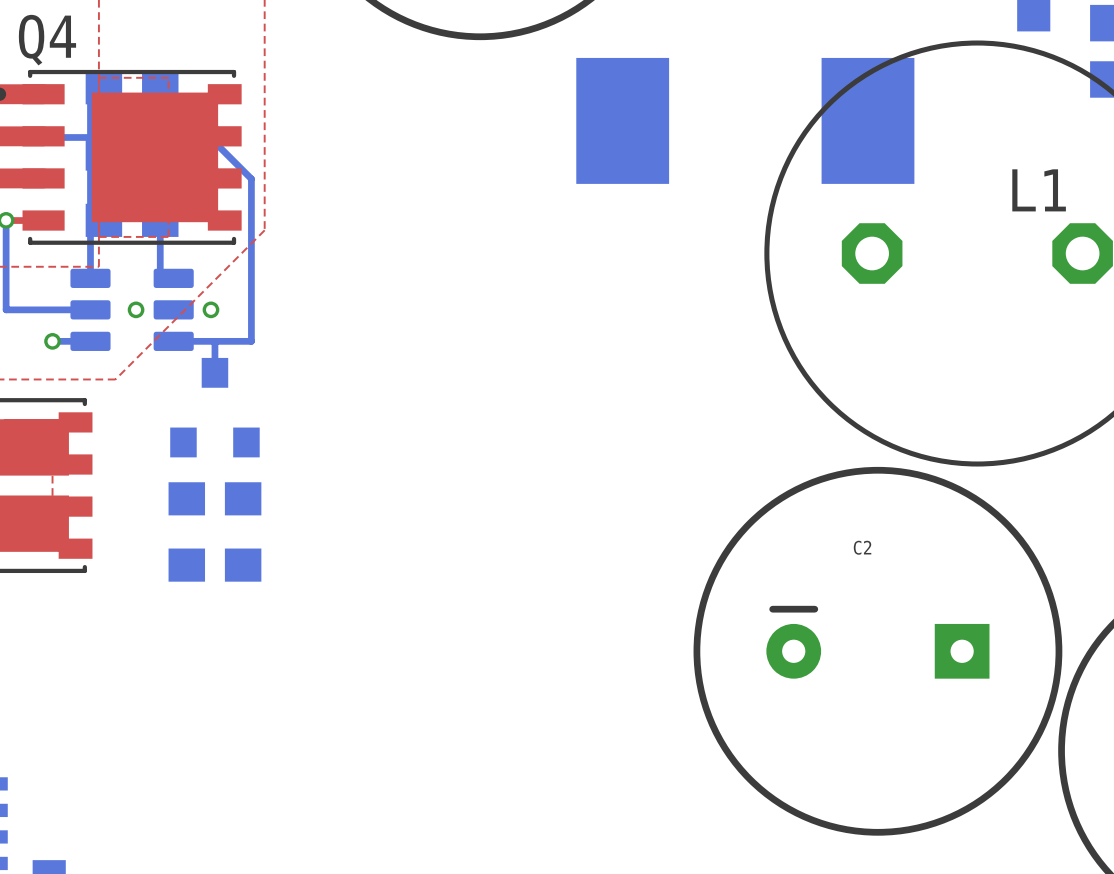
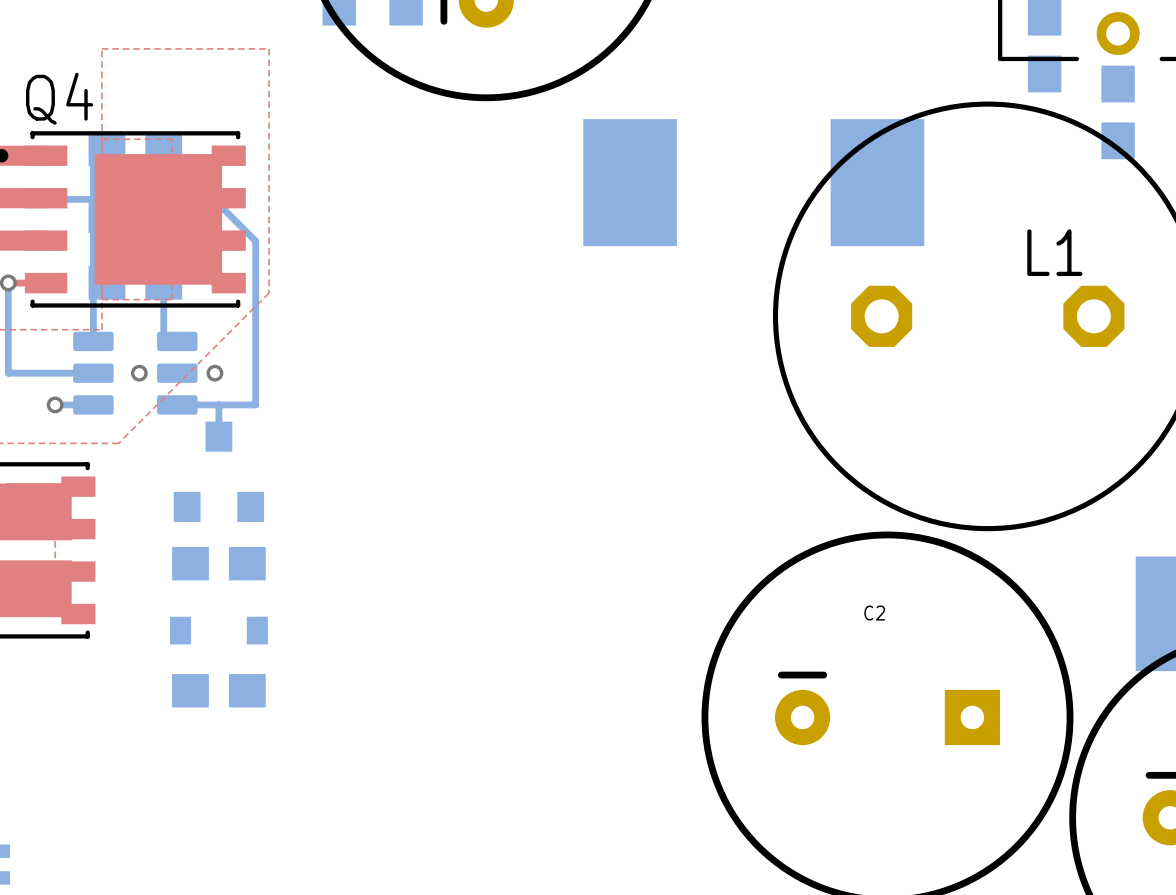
part footprint: [168, 548, 262, 582] -> [169, 616, 268, 645]
part: none -> (218, 690)

